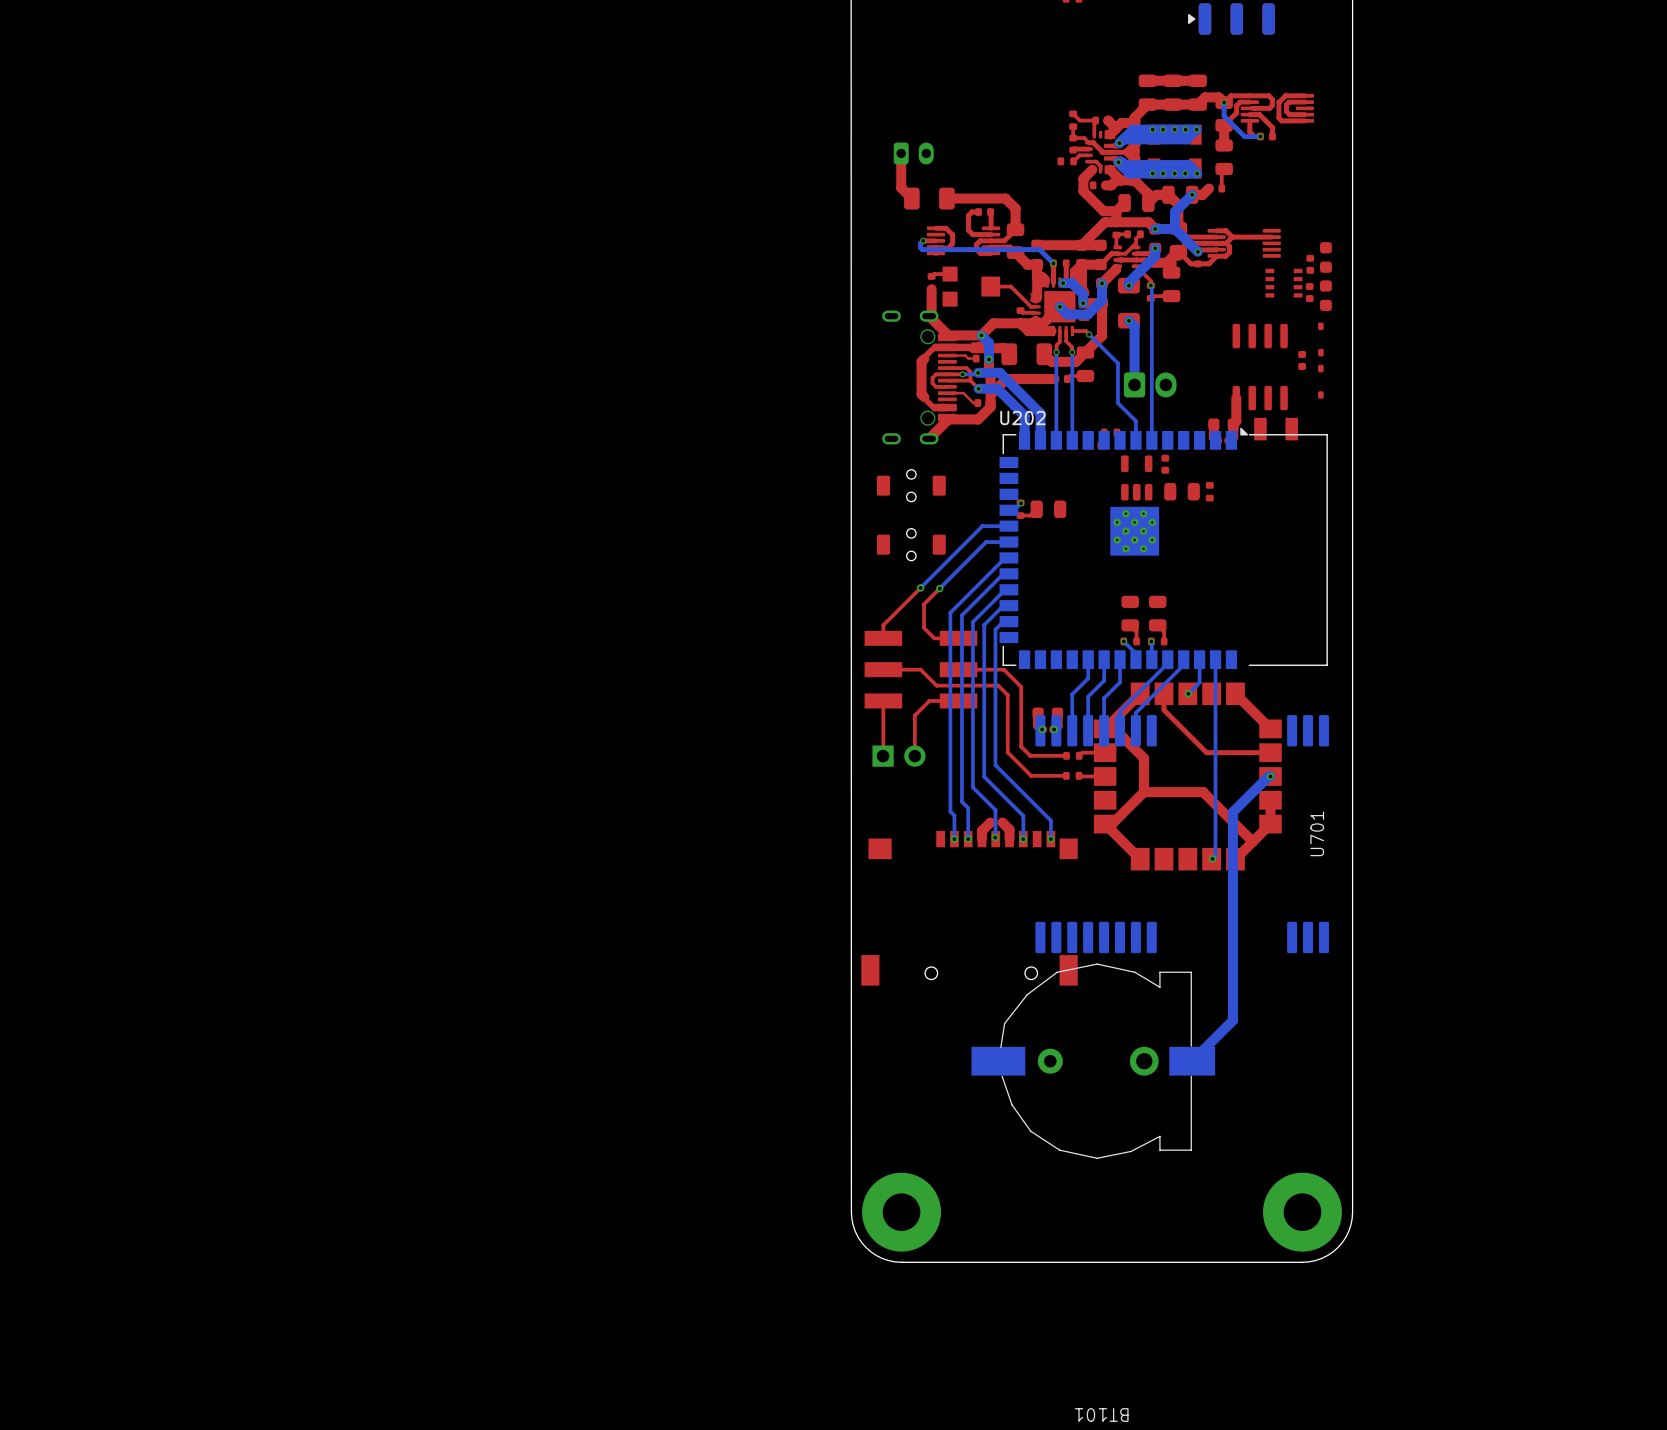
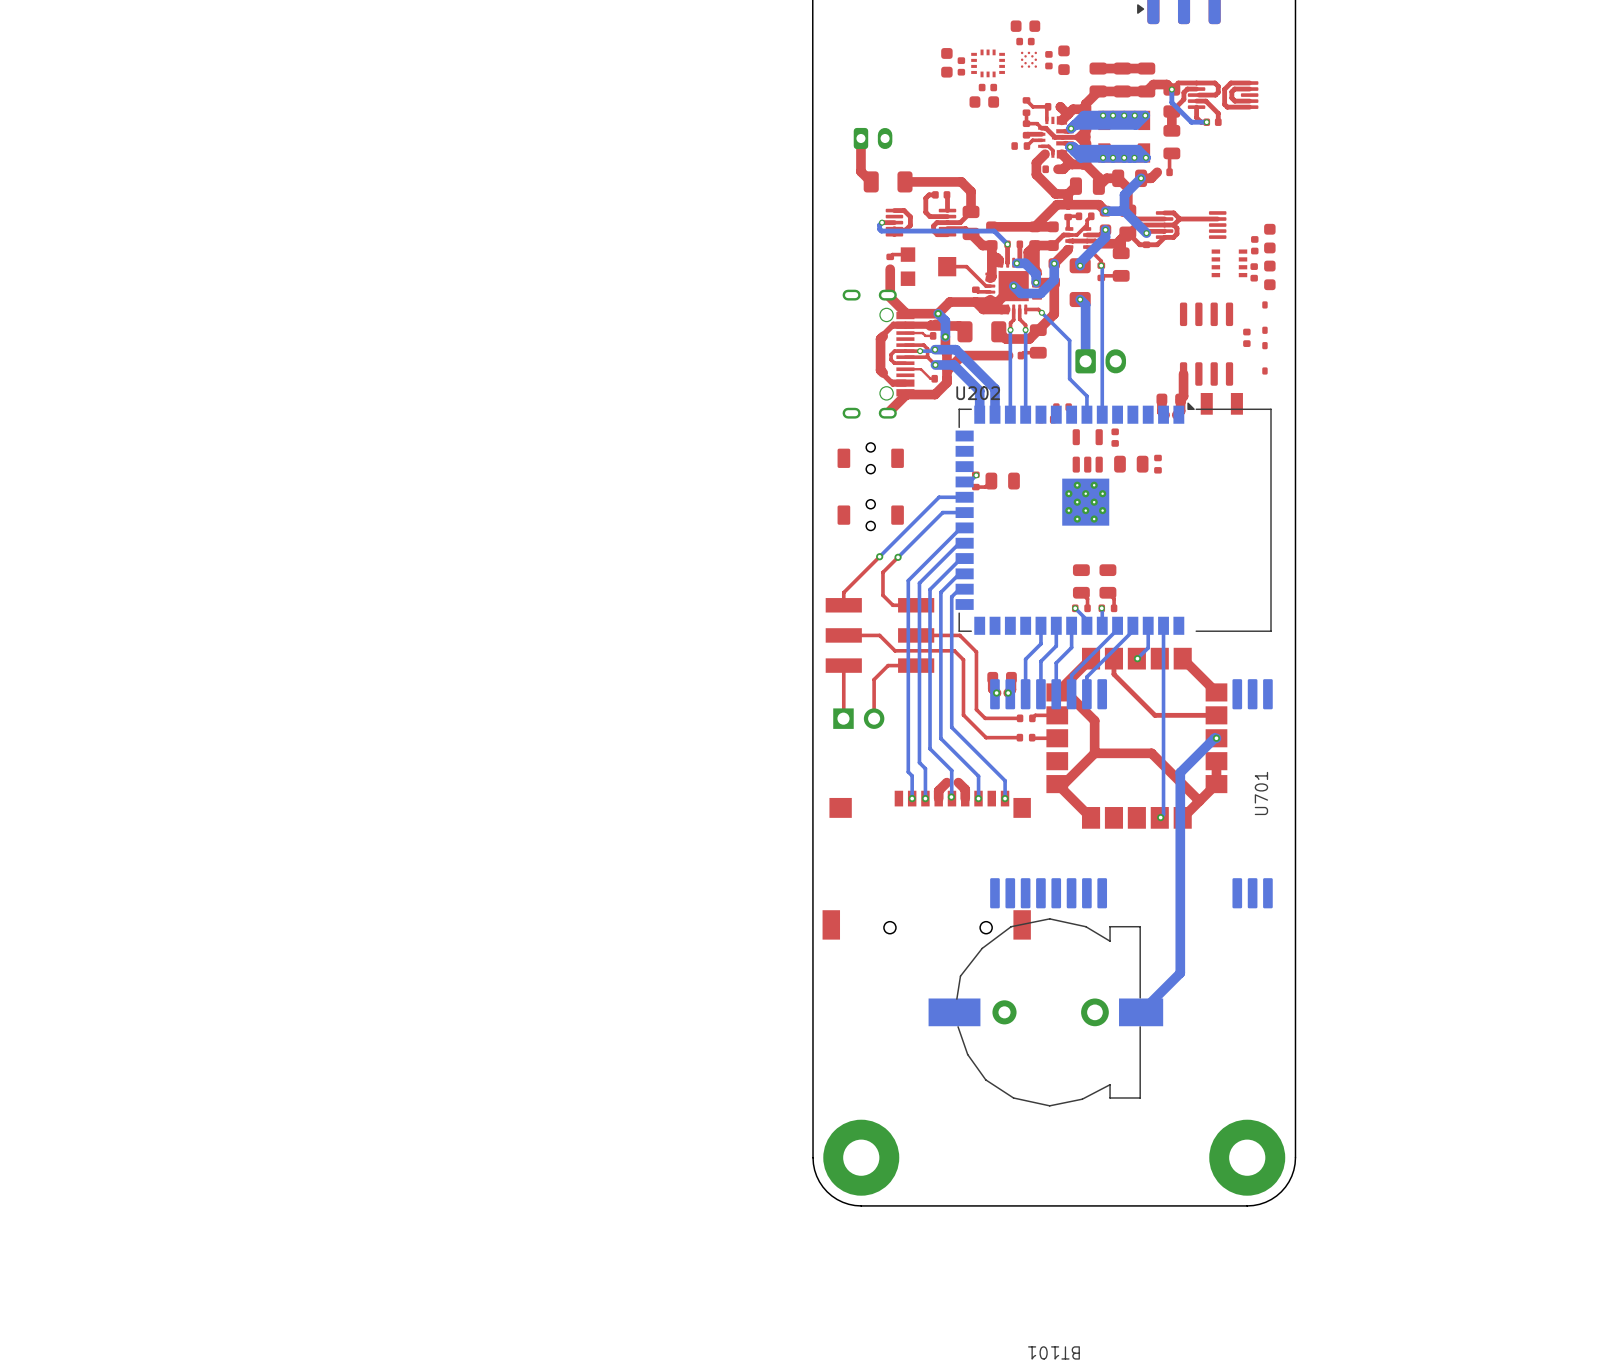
part: none -> (1025, 26)
part: none -> (1025, 41)
part: none -> (1028, 59)
part: none -> (1048, 60)
part: none -> (1063, 60)
part: none -> (946, 62)
part: none -> (988, 63)
part: none -> (961, 66)
part: none -> (987, 87)
part: none -> (984, 102)

